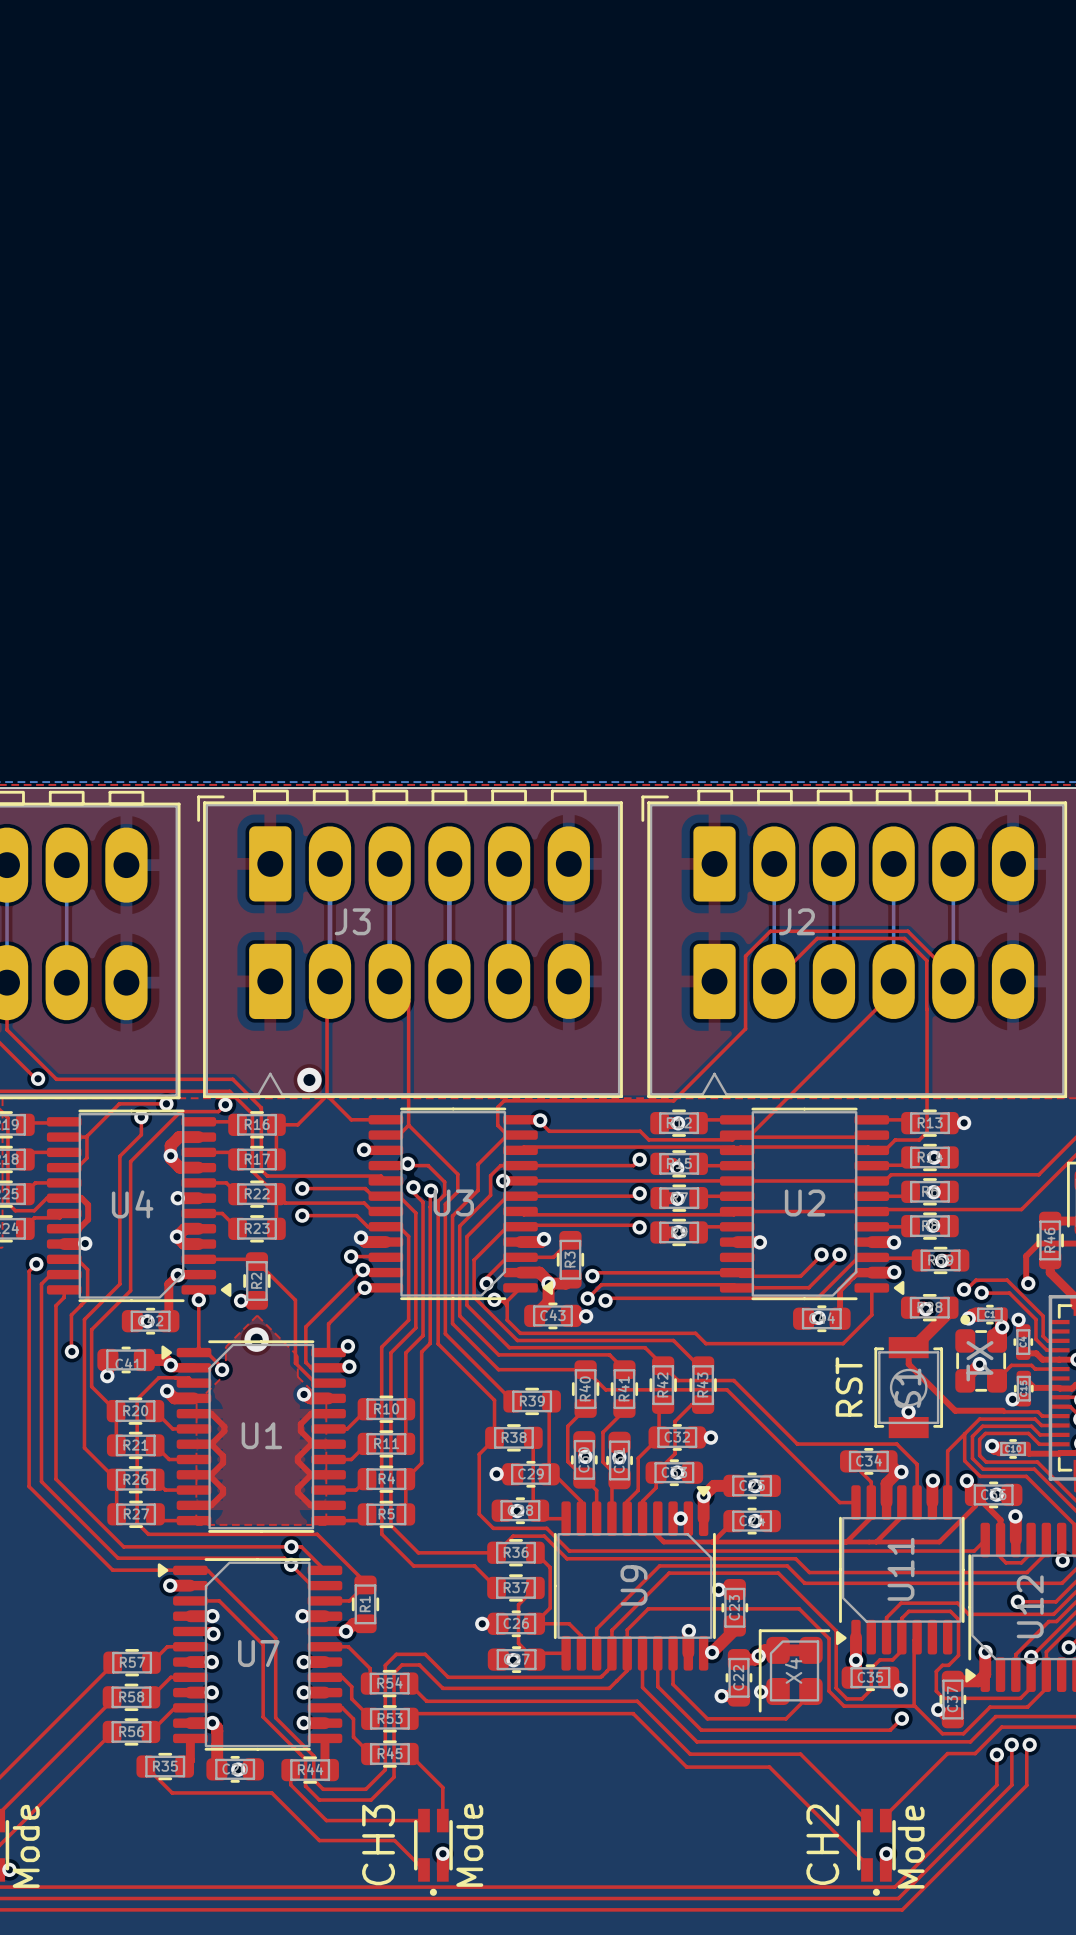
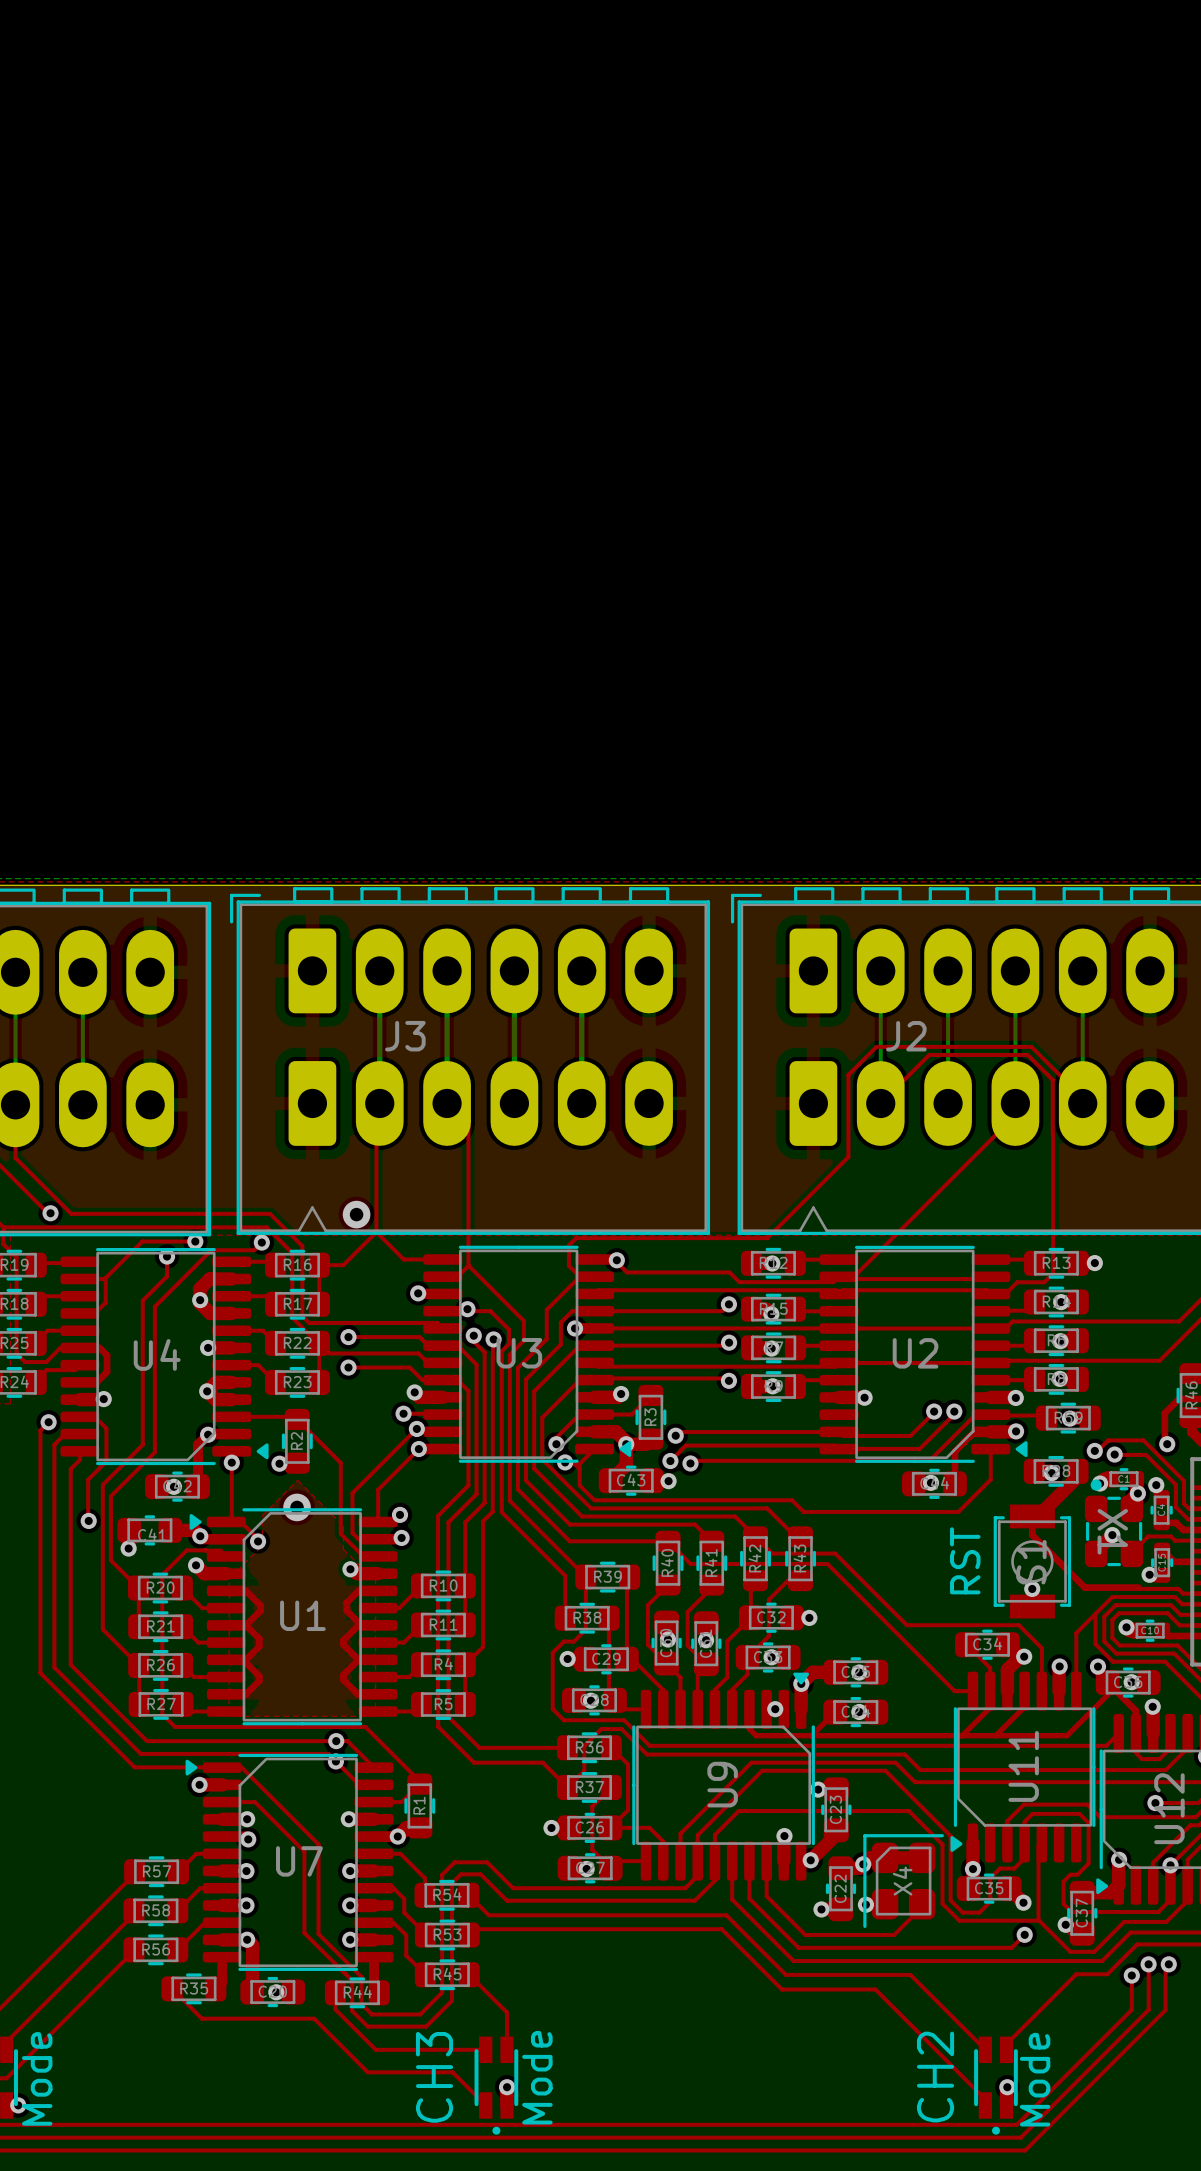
top track: (494, 1439) (479, 1454) (479, 1514) (483, 1518) -> (585, 1577) (585, 1629) (573, 1641) (563, 1641) (552, 1652) (552, 1708)
top track: (526, 1536) (513, 1536) (496, 1552) -> (601, 1729) (584, 1745) (584, 1770) (567, 1787)

